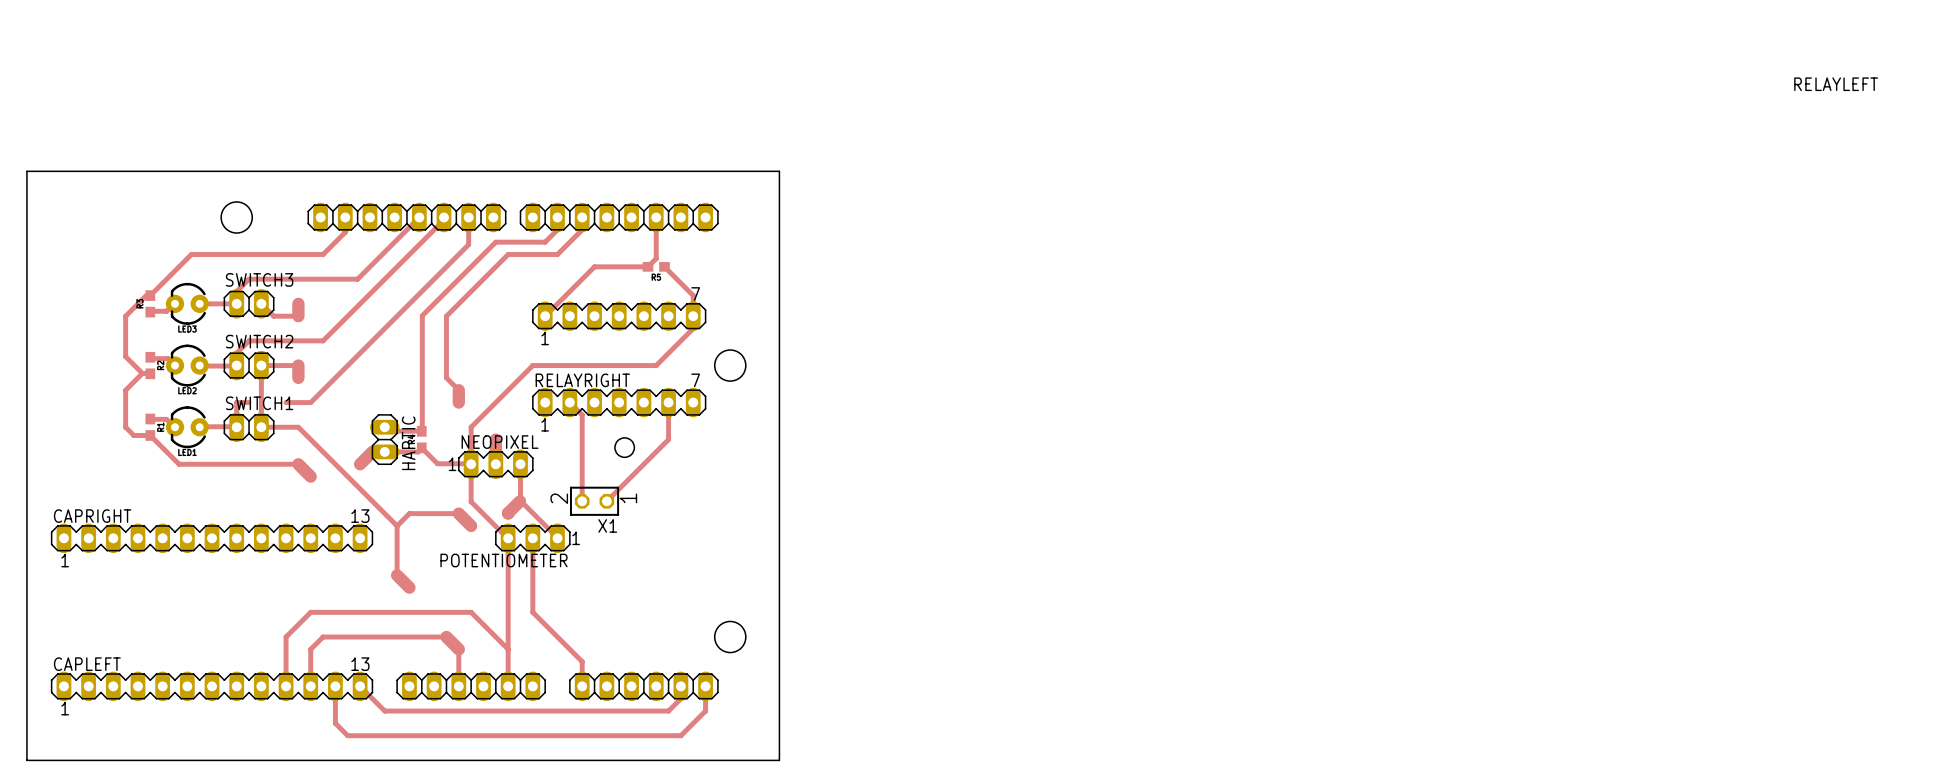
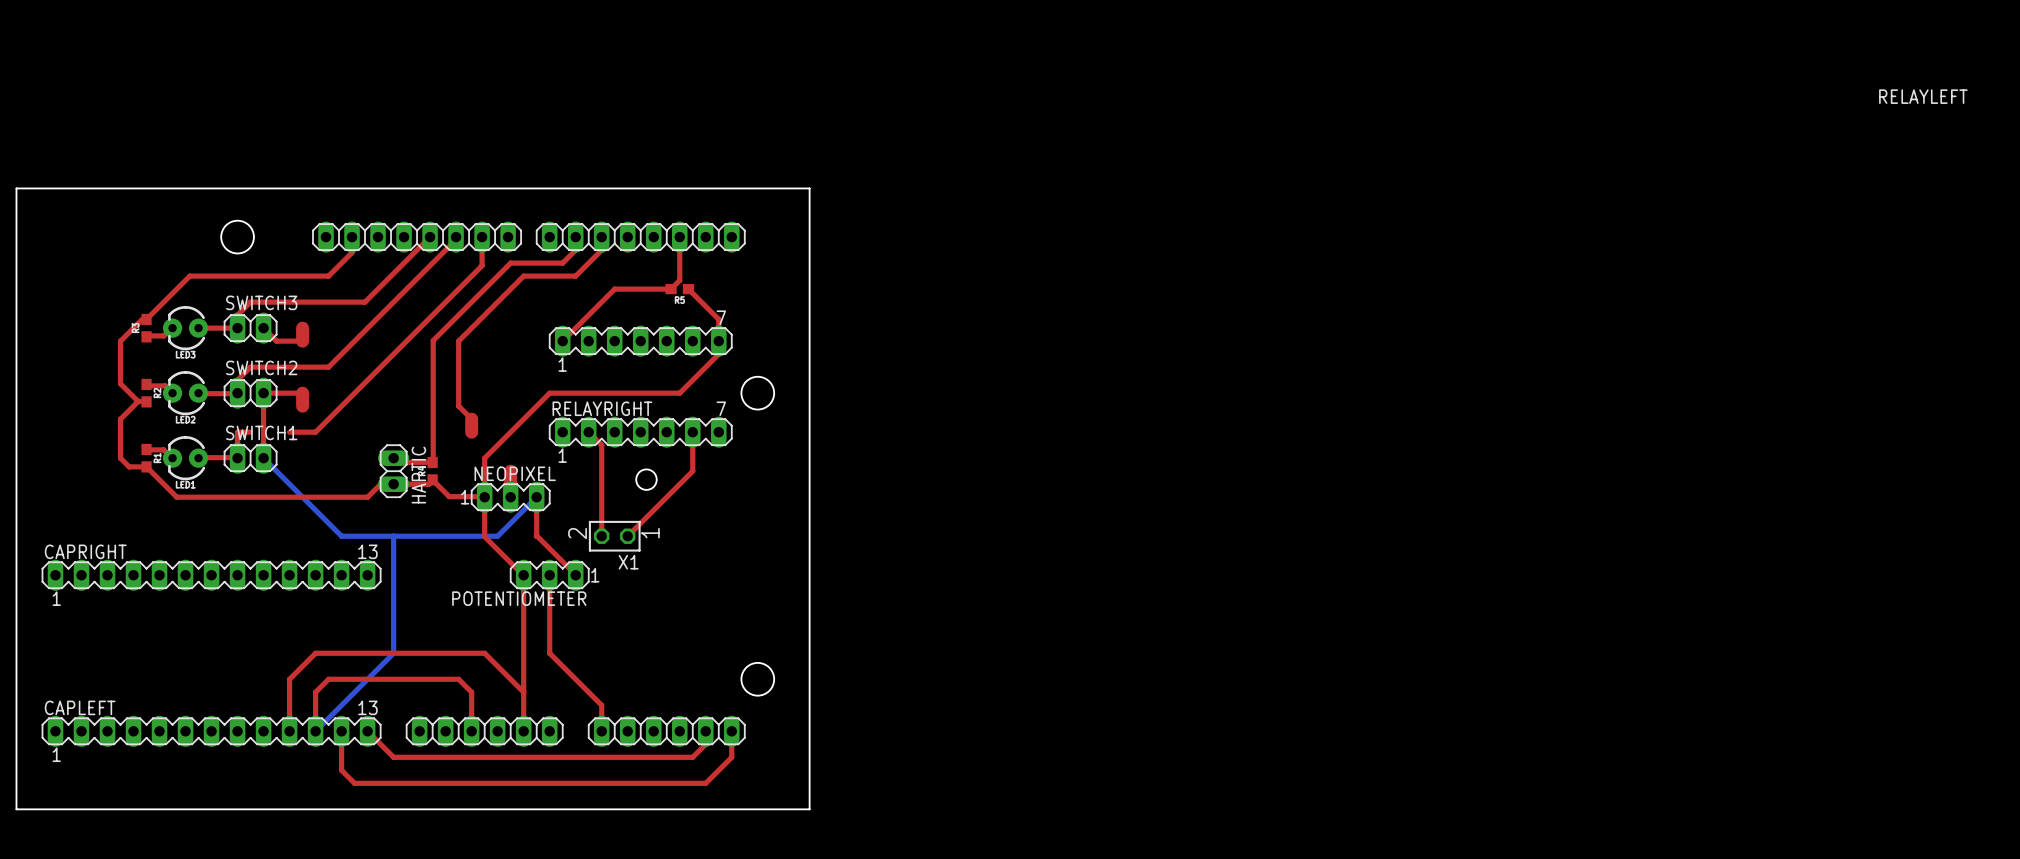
top track: (261, 427) (298, 427) (397, 525) -> none
bottom track: none -> (263, 458) (341, 536) (497, 536) (536, 497)
top track width: thick (372, 451) (360, 464) -> thin (380, 484) (367, 497)
top track: (298, 464) (310, 476) -> (302, 497) (367, 497)
bottom track: none -> (393, 536) (393, 653) (315, 731)
top track: (520, 501) (508, 513) -> none
top track: (397, 525) (409, 513) (458, 513) (471, 525) -> none
top track: (397, 525) (397, 575) (409, 587) -> none
top track width: thick (446, 637) (458, 649) -> thin (458, 679) (471, 692)

